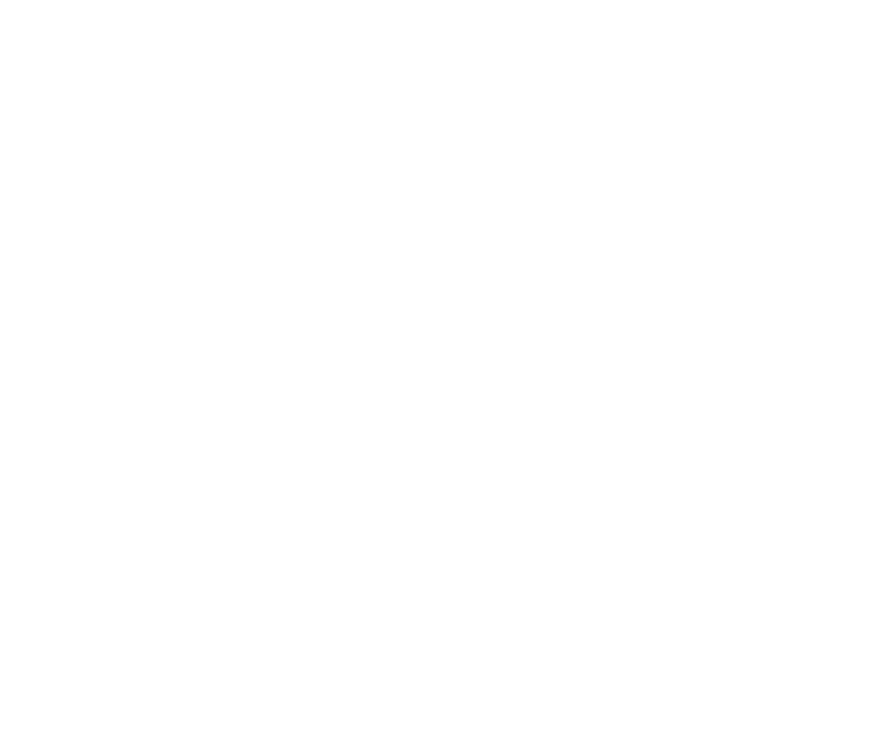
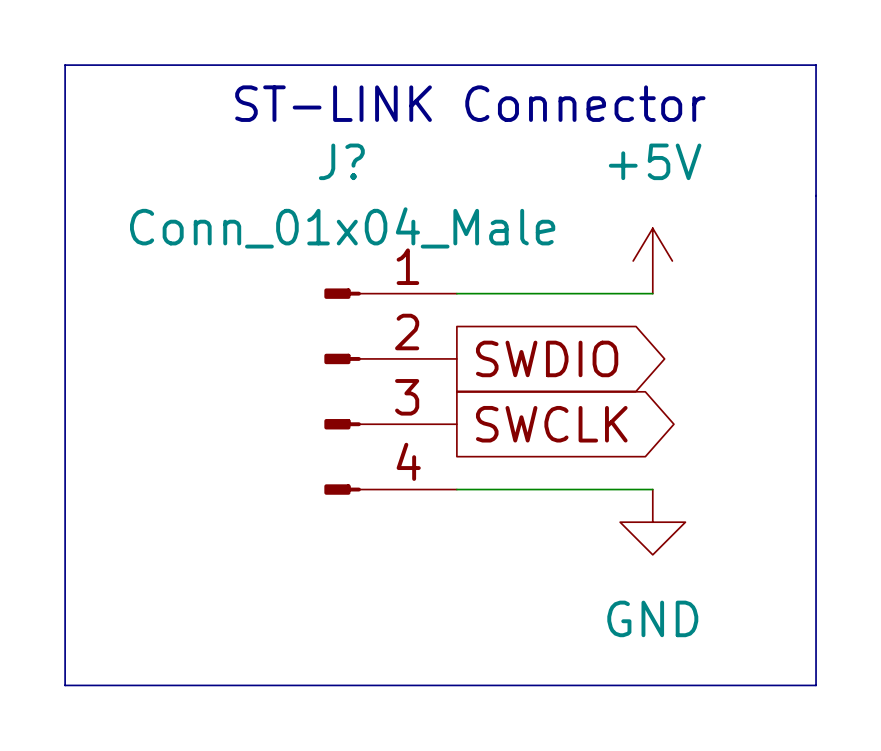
line: none -> (65, 65) (816, 65) (816, 685) (65, 685) (65, 65)
text: none -> ST-LINK Connector (470, 103)
power symbol: none -> +5V (652, 260)
wire: none -> (456, 293) (652, 293)
global label: none -> SWDIO (547, 358)
J?: none -> Conn_01x04_Male (390, 391)
global label: none -> SWCLK (551, 424)
wire: none -> (456, 489) (652, 489)
power symbol: none -> GND (652, 522)

